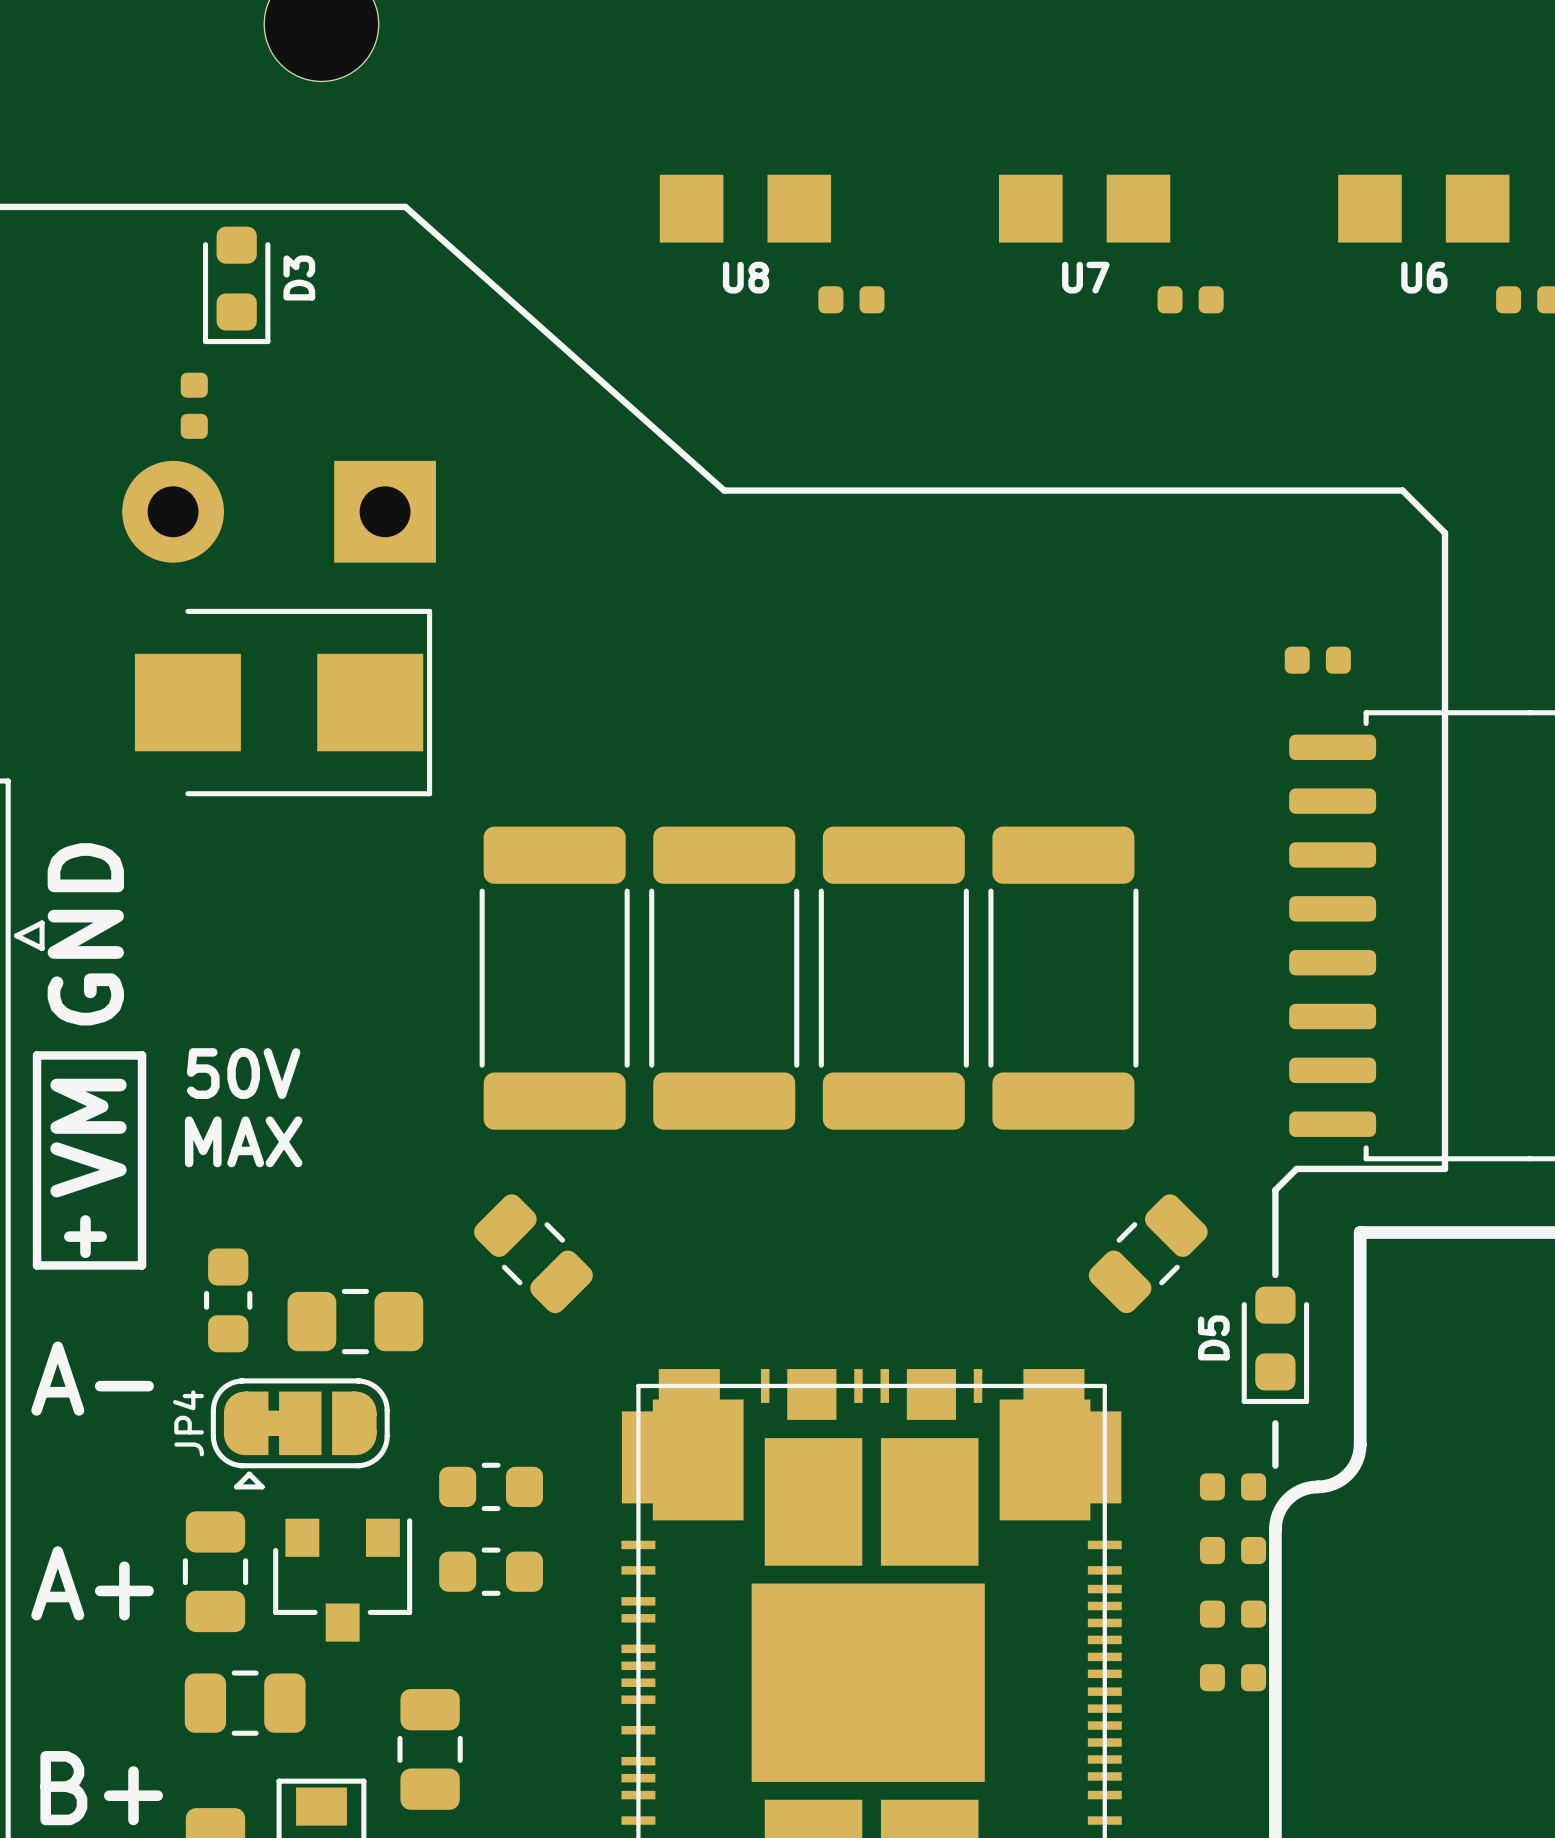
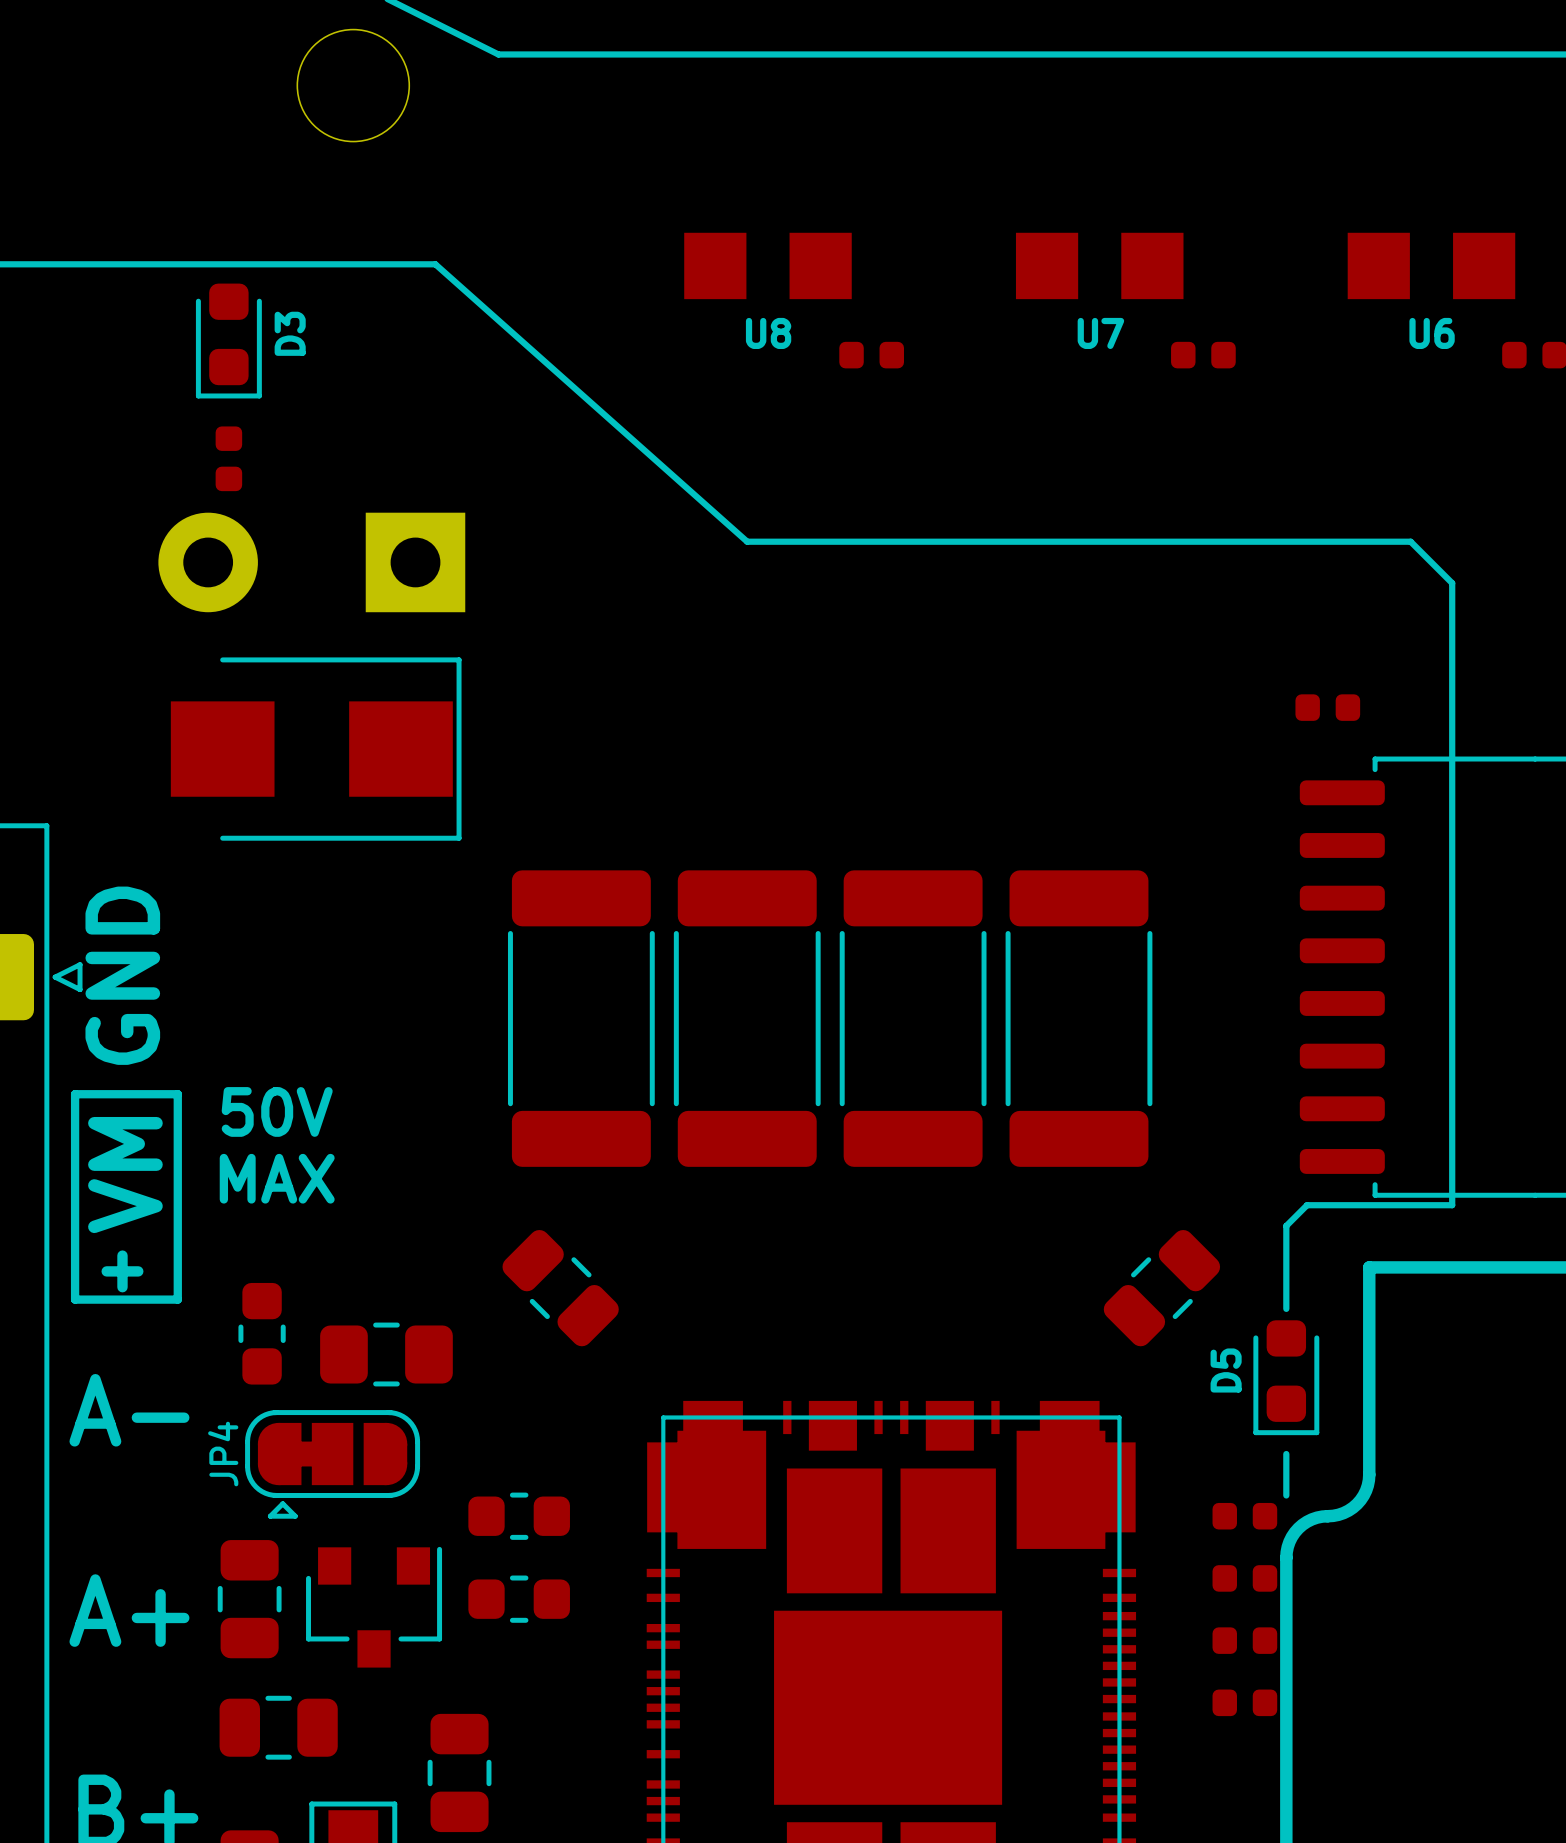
D3 position: (236, 285) -> (228, 341)

